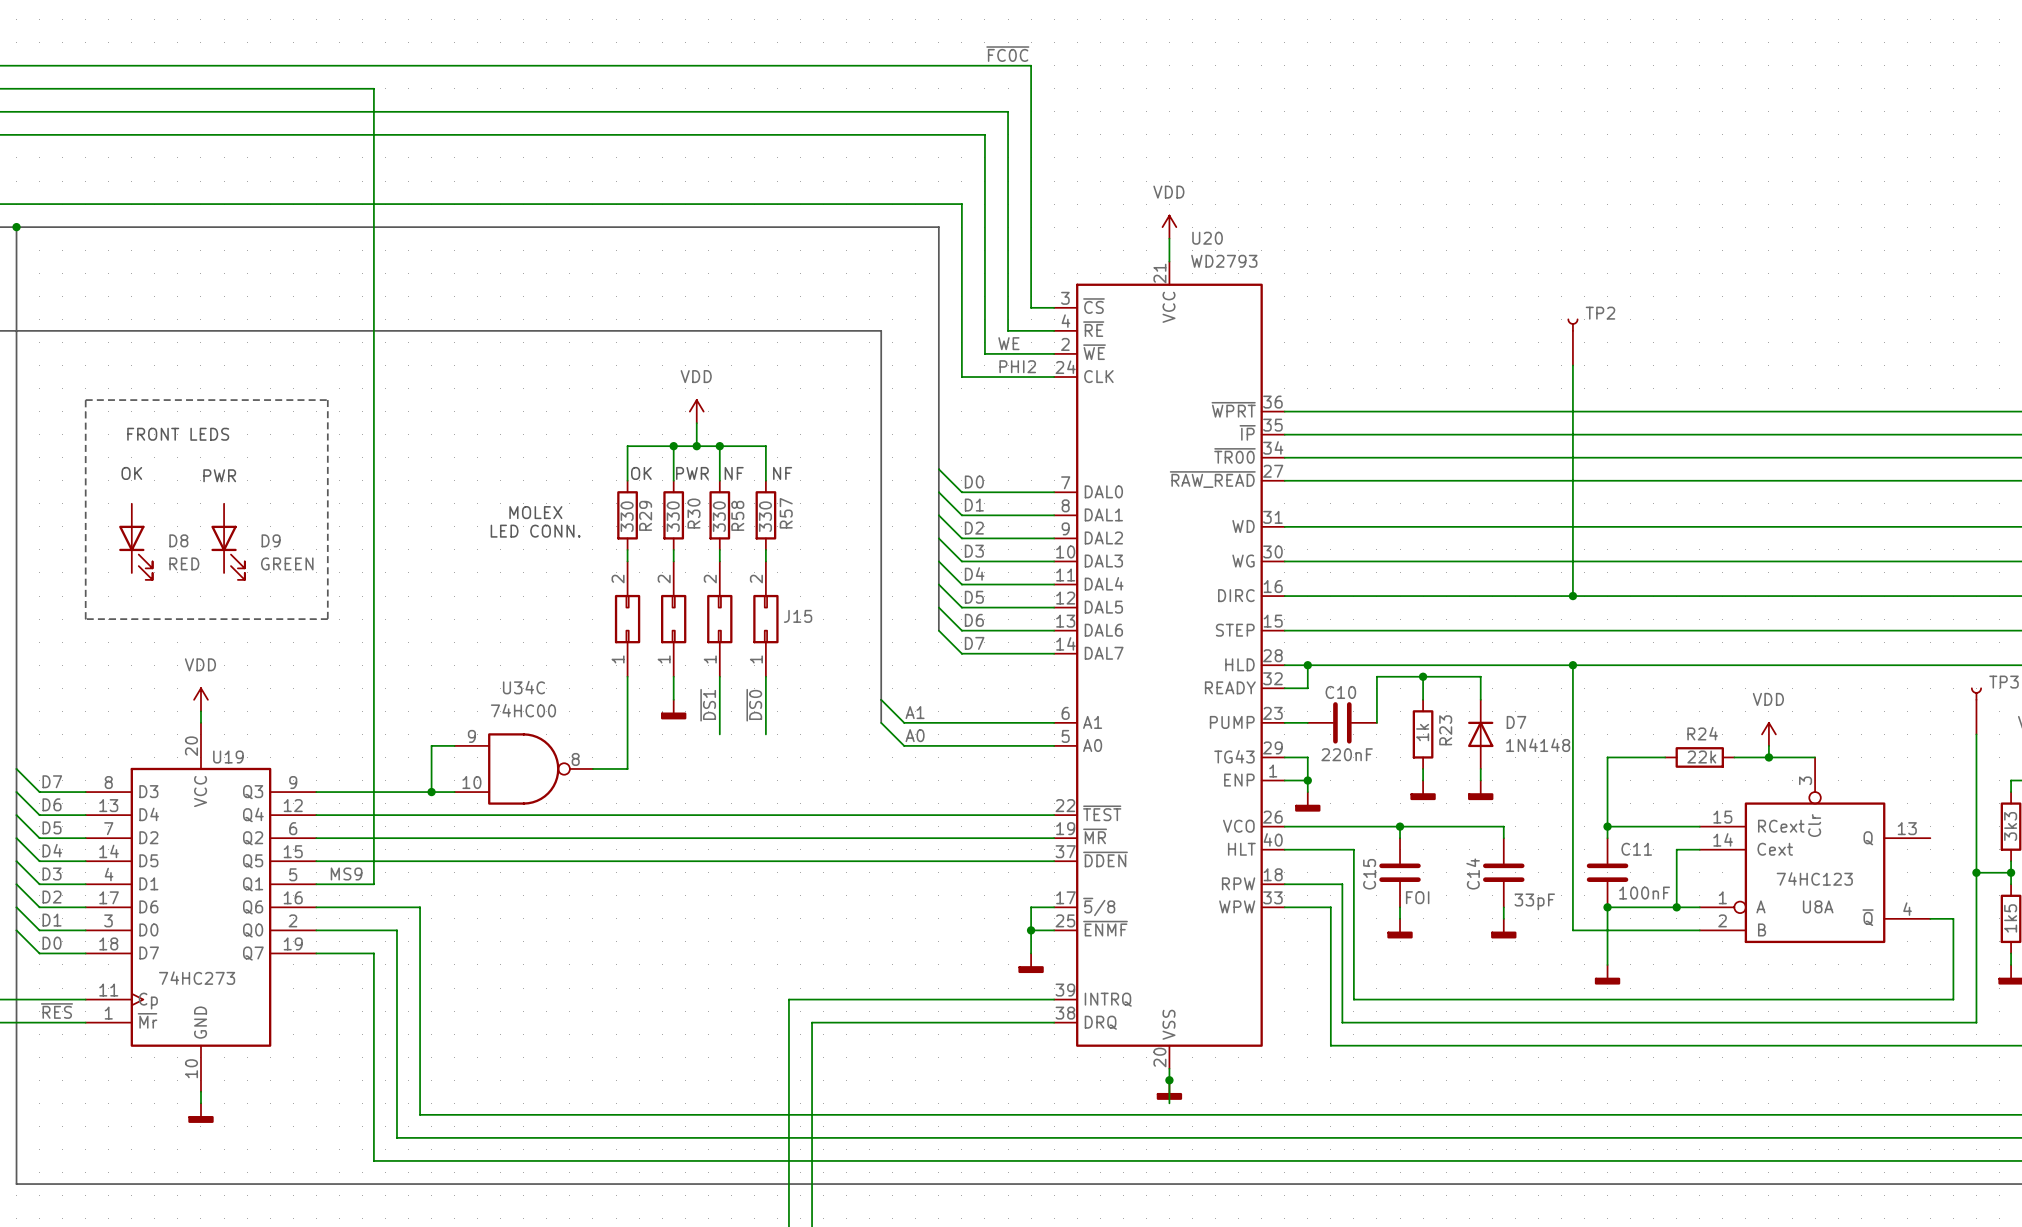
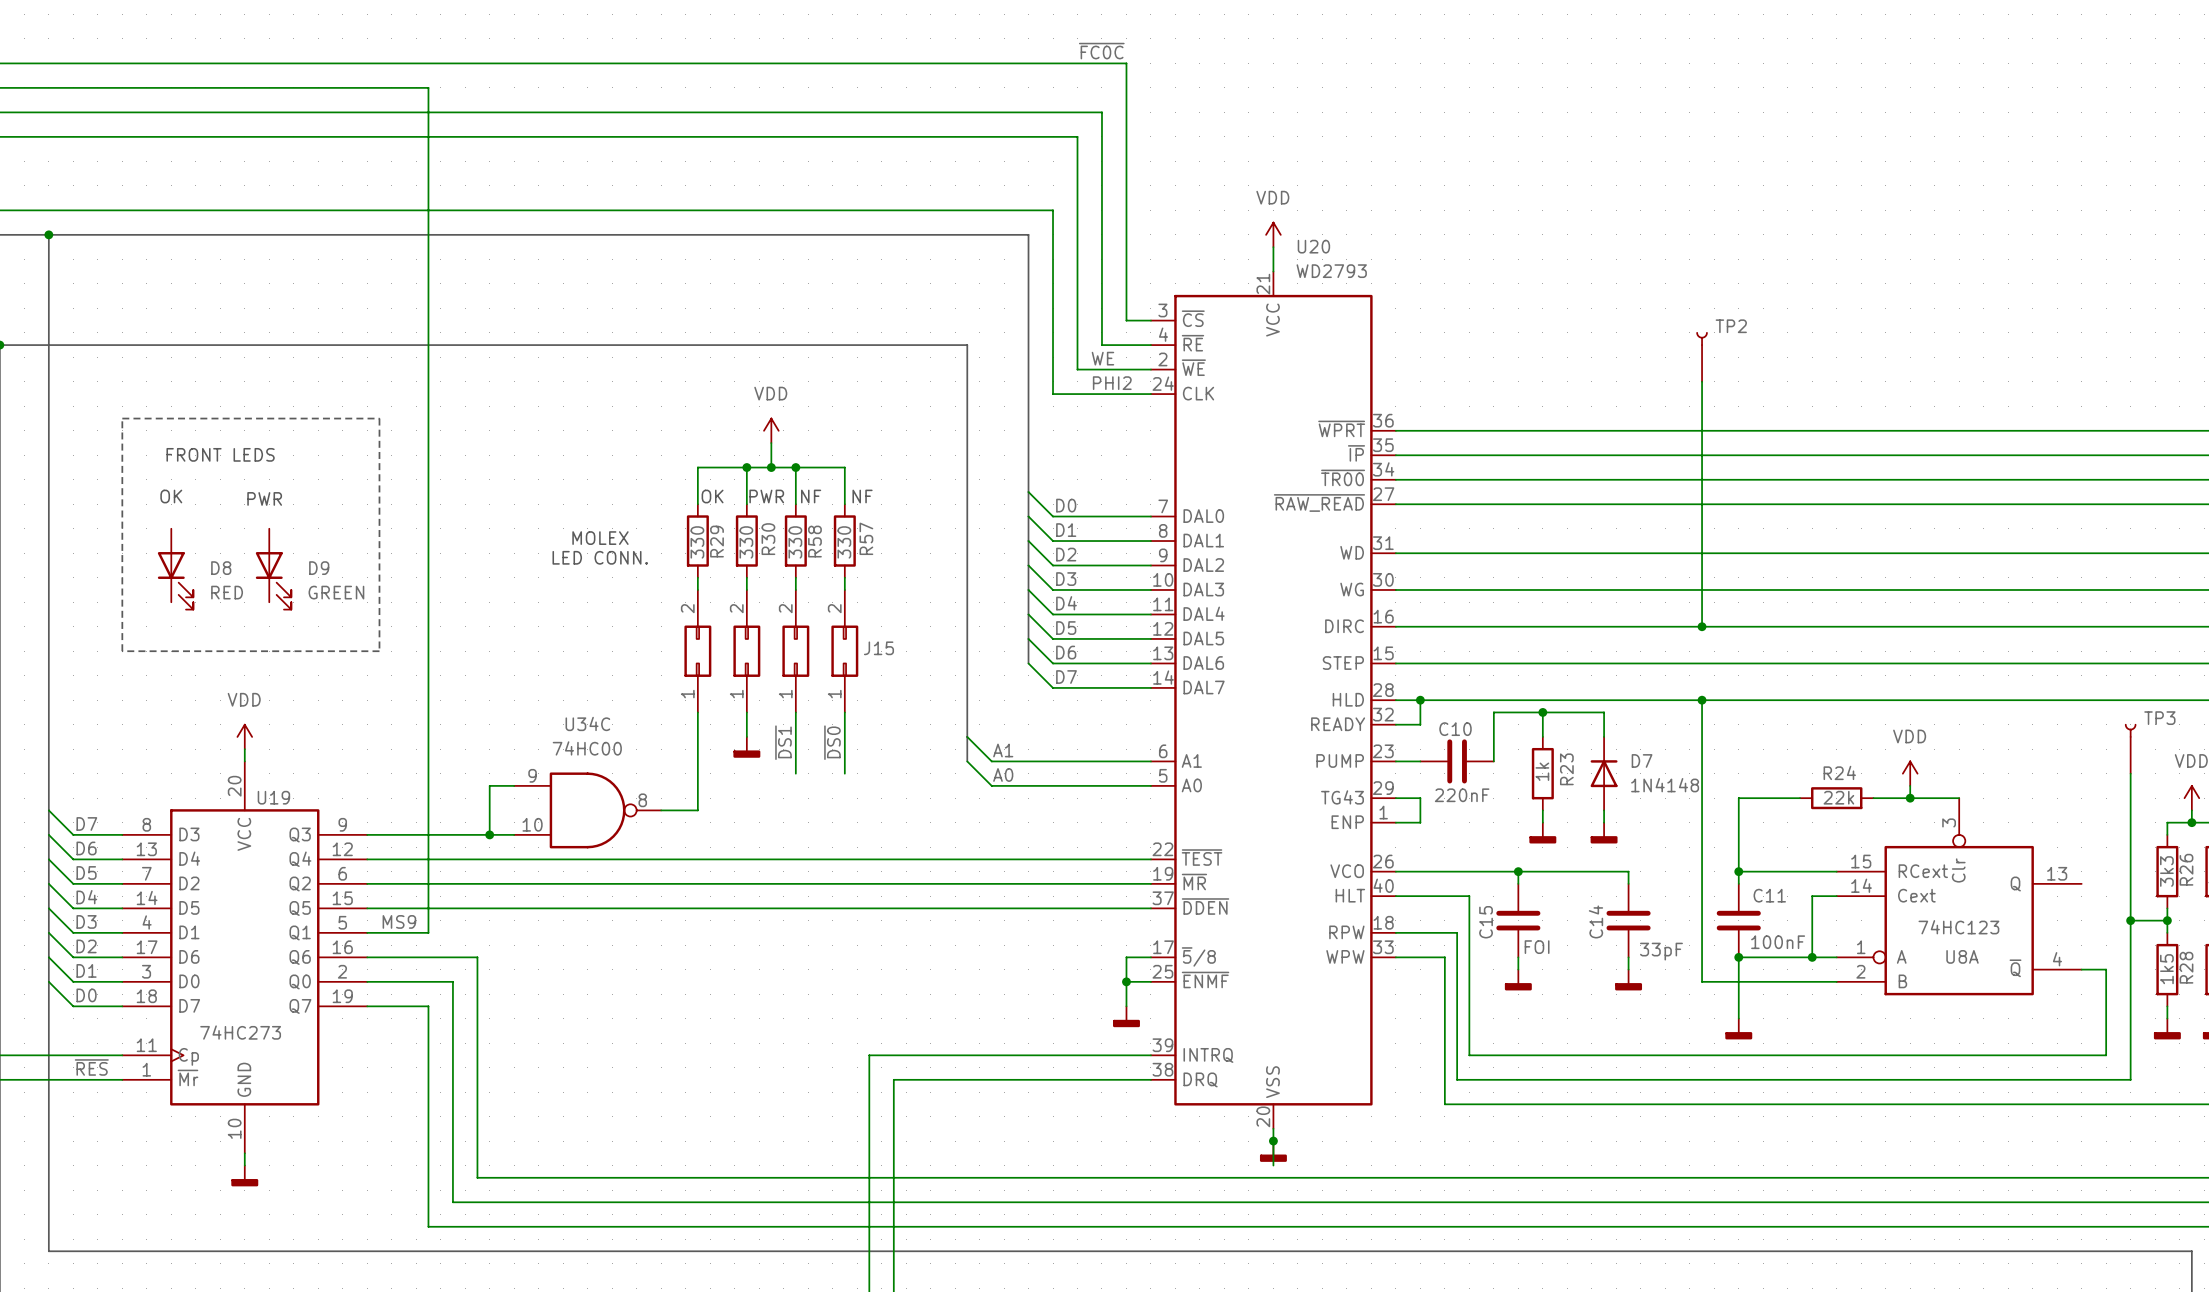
wire: (1307, 780) (1307, 792) -> none
junction: (1307, 780) -> none
power symbol: (1307, 801) -> none

